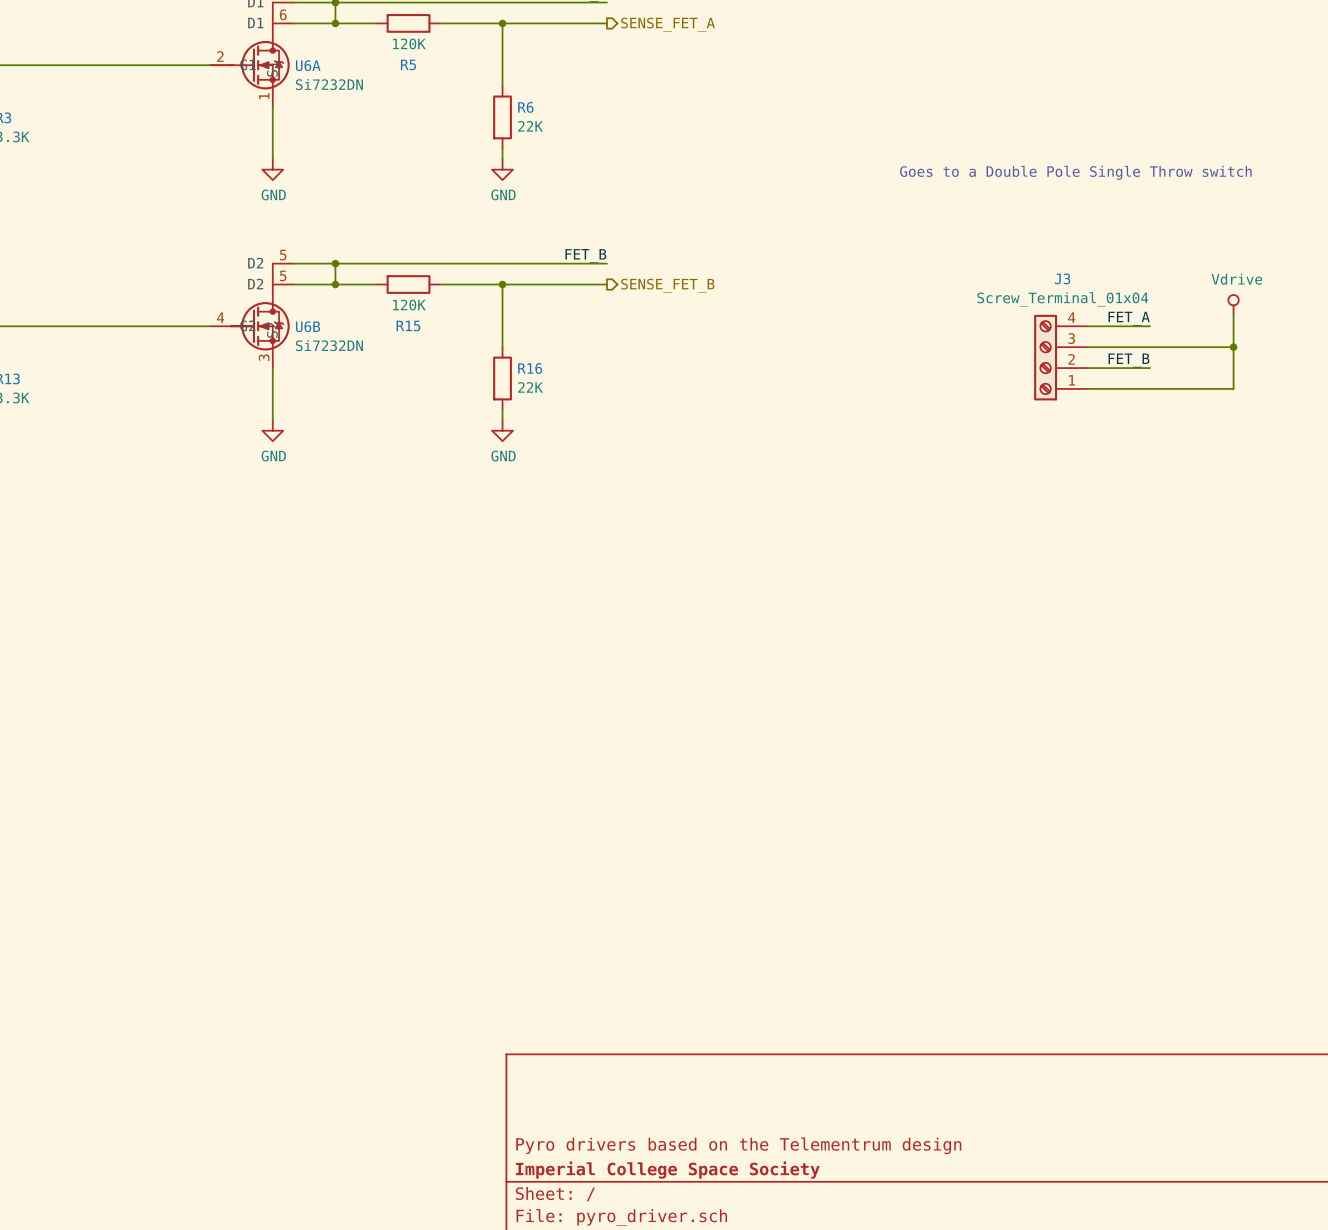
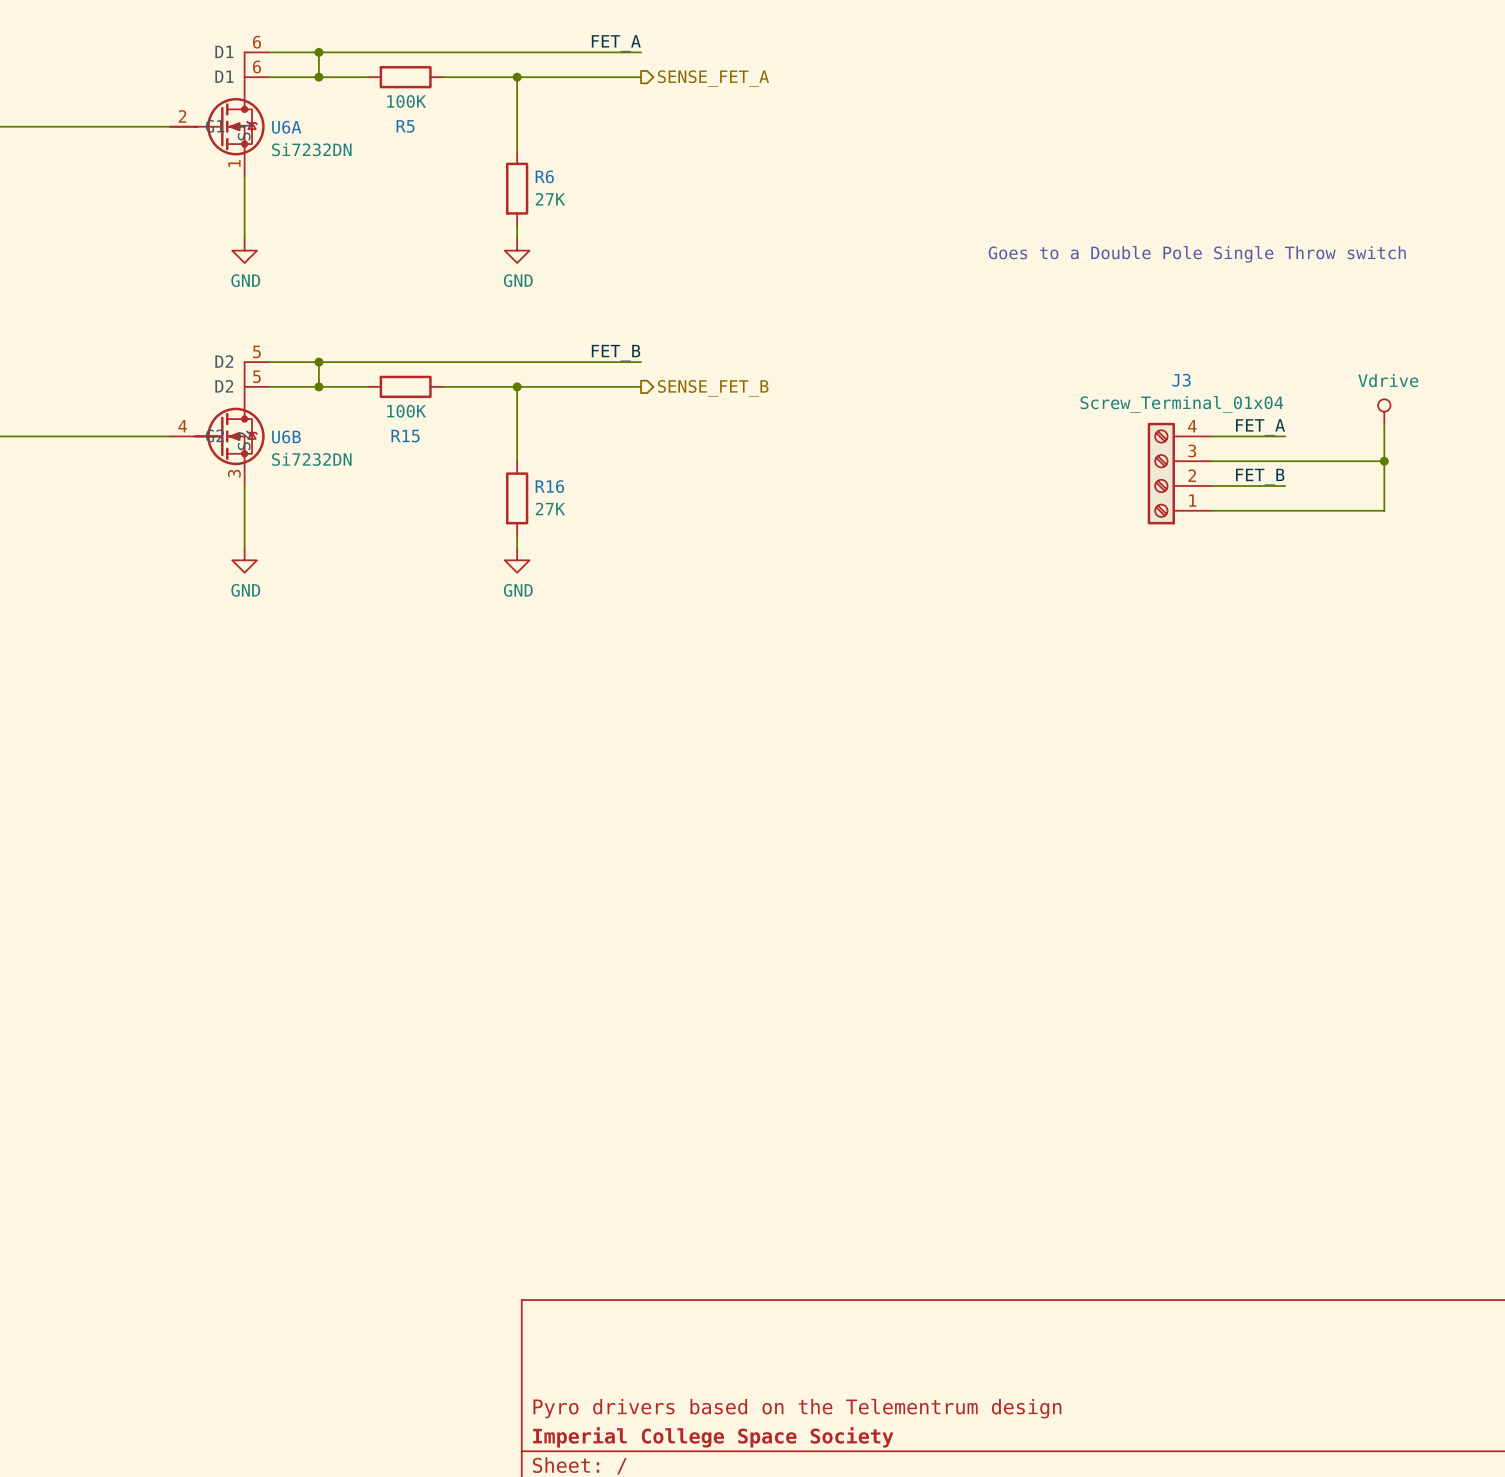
R5 value: 120K (409, 43) -> 100K (406, 101)
R6 value: 22K (530, 126) -> 27K (550, 199)
R15 value: 120K (409, 305) -> 100K (406, 411)
R16 value: 22K (530, 387) -> 27K (550, 508)

